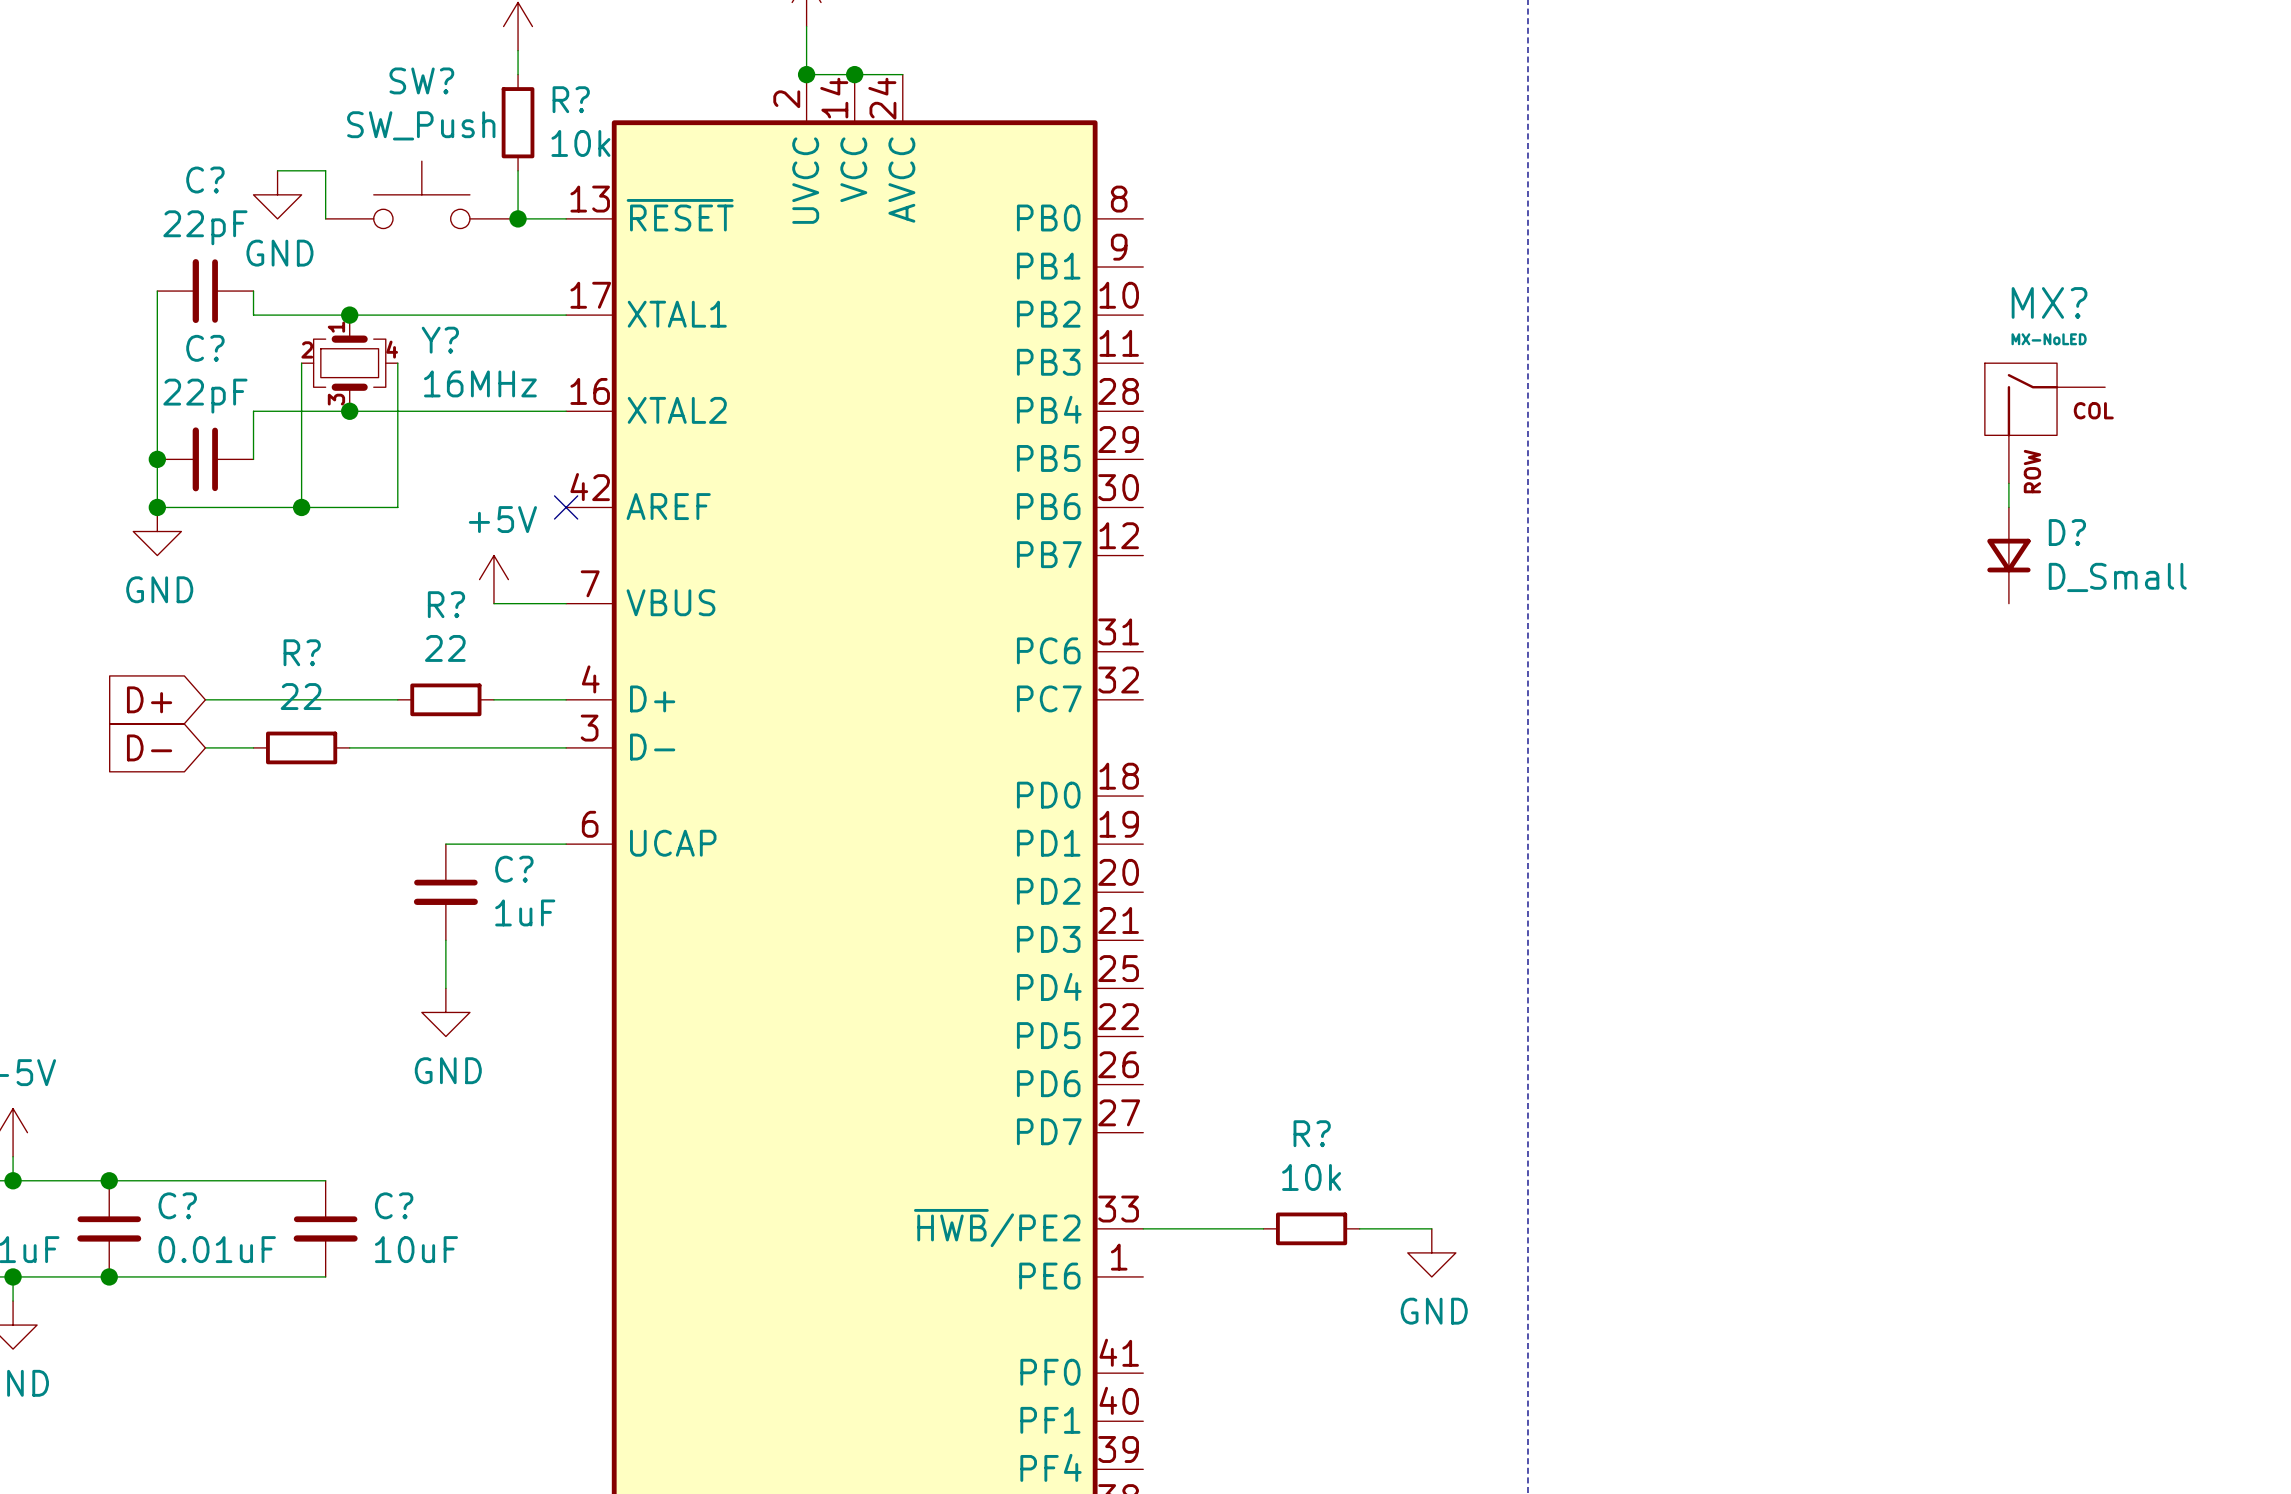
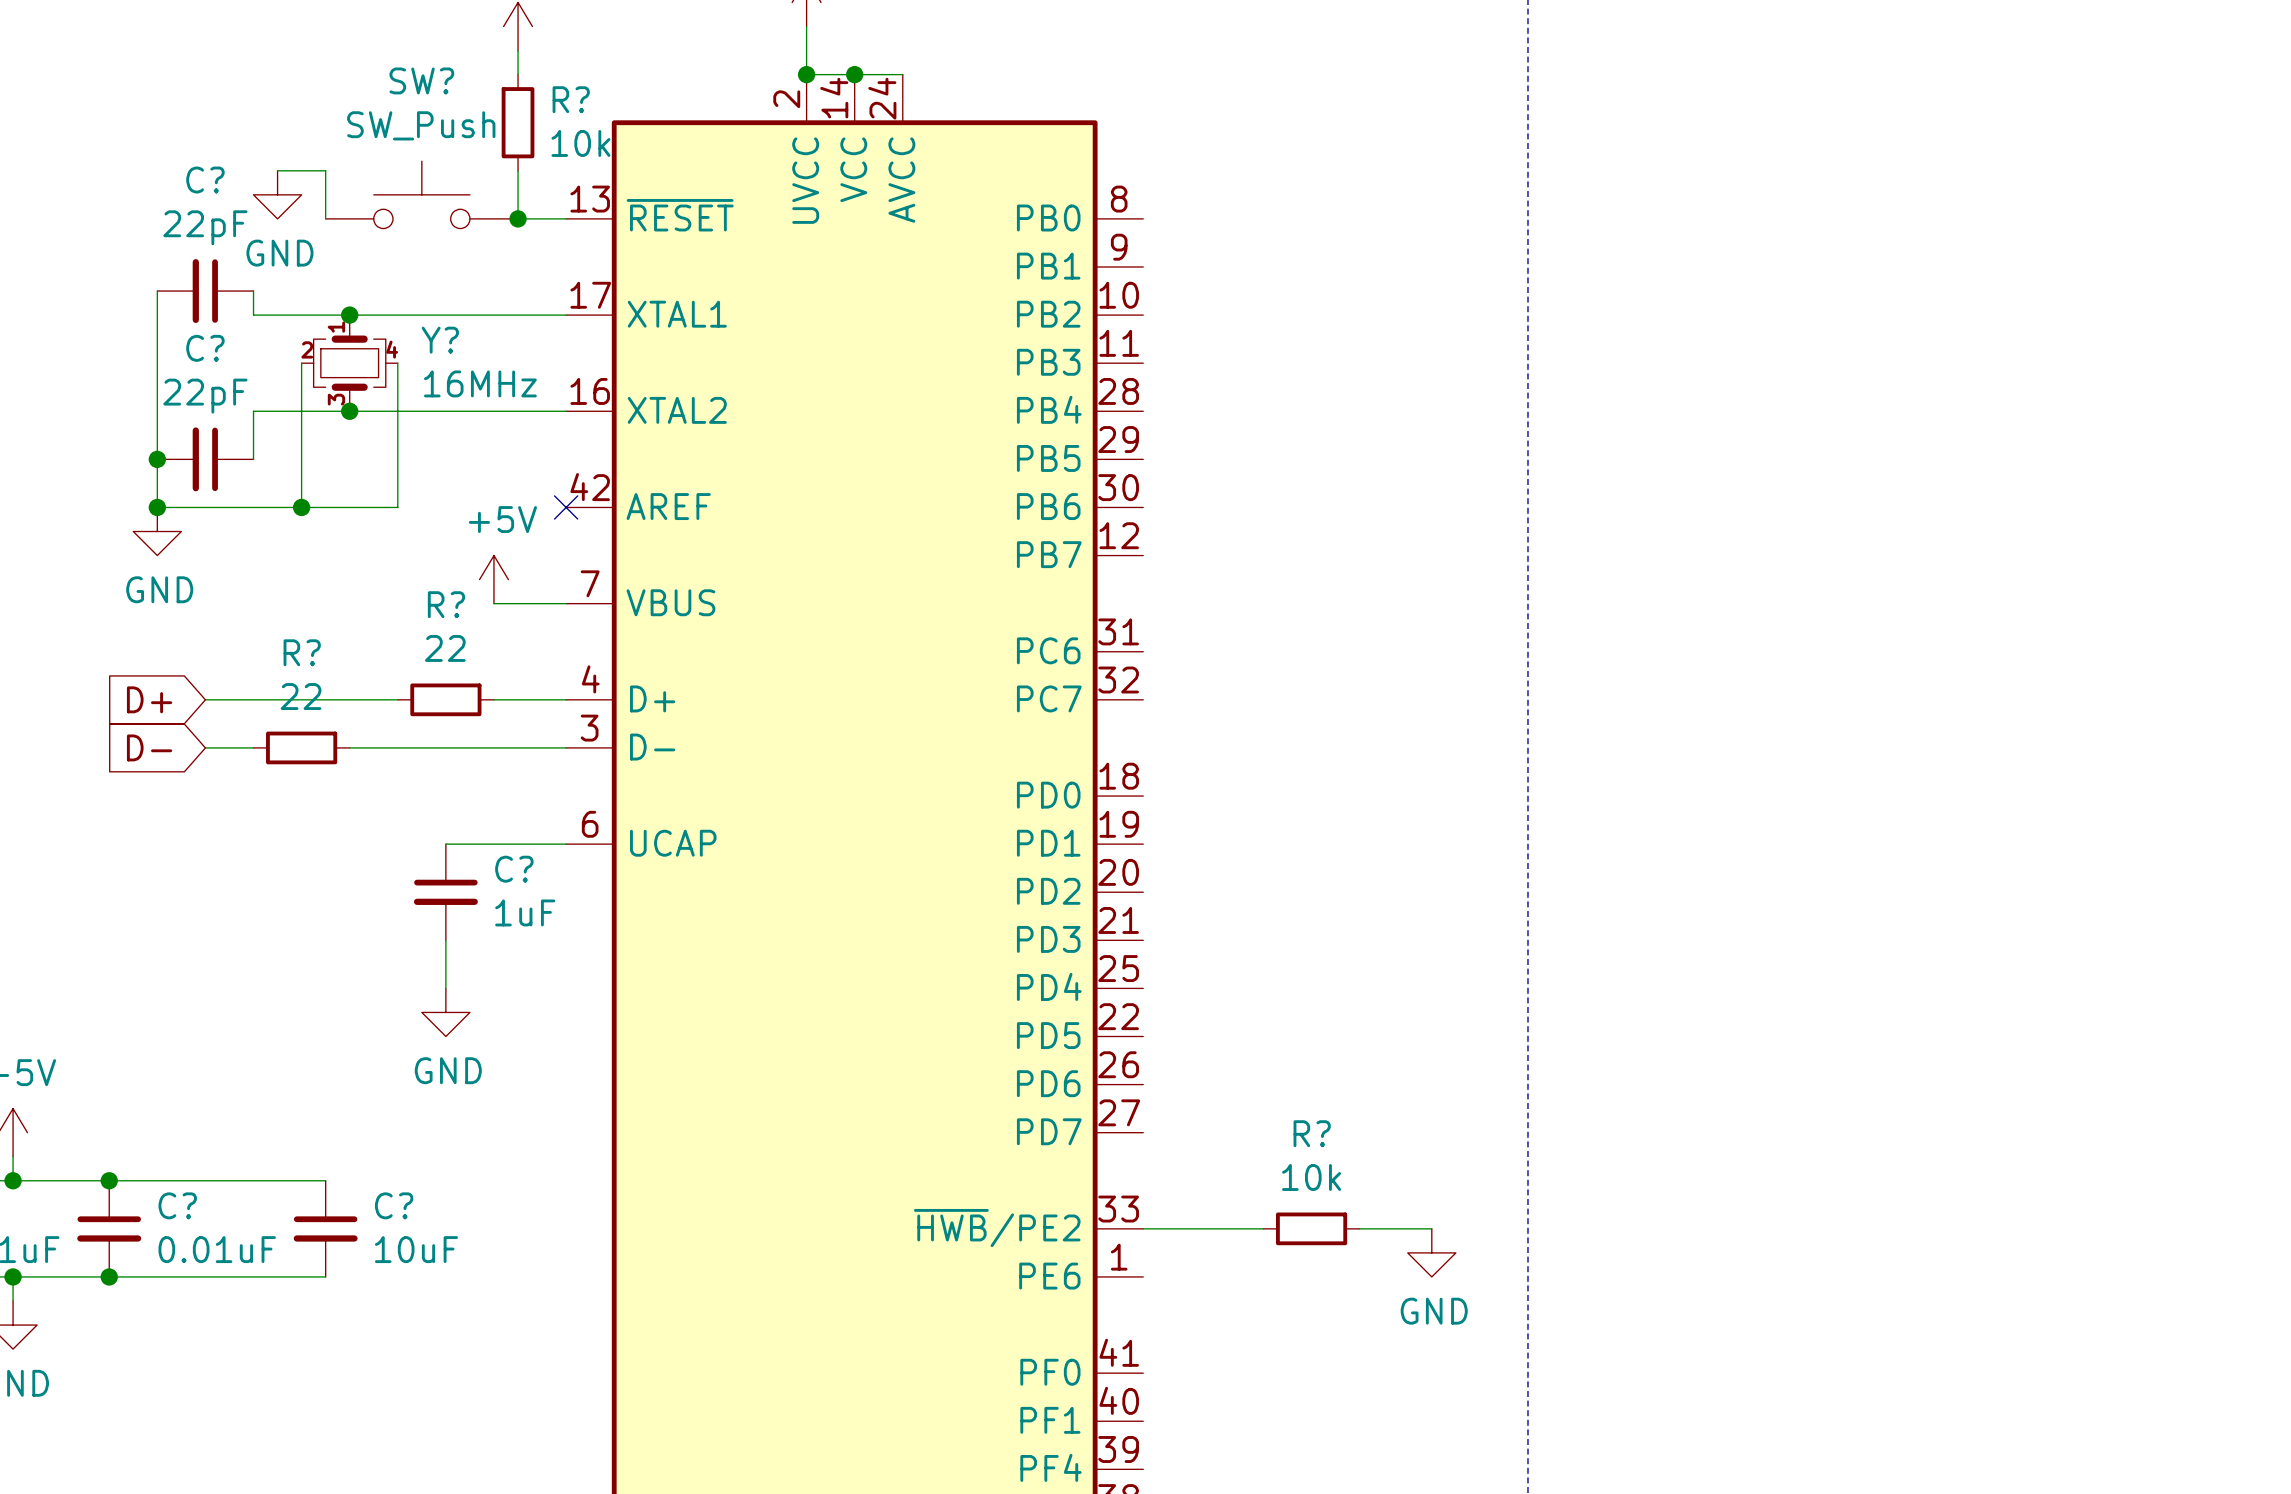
MX?: MX-NoLED (2045, 423) -> none
wire: (2008, 483) (2008, 507) -> none
D?: D_Small (2008, 555) -> none

